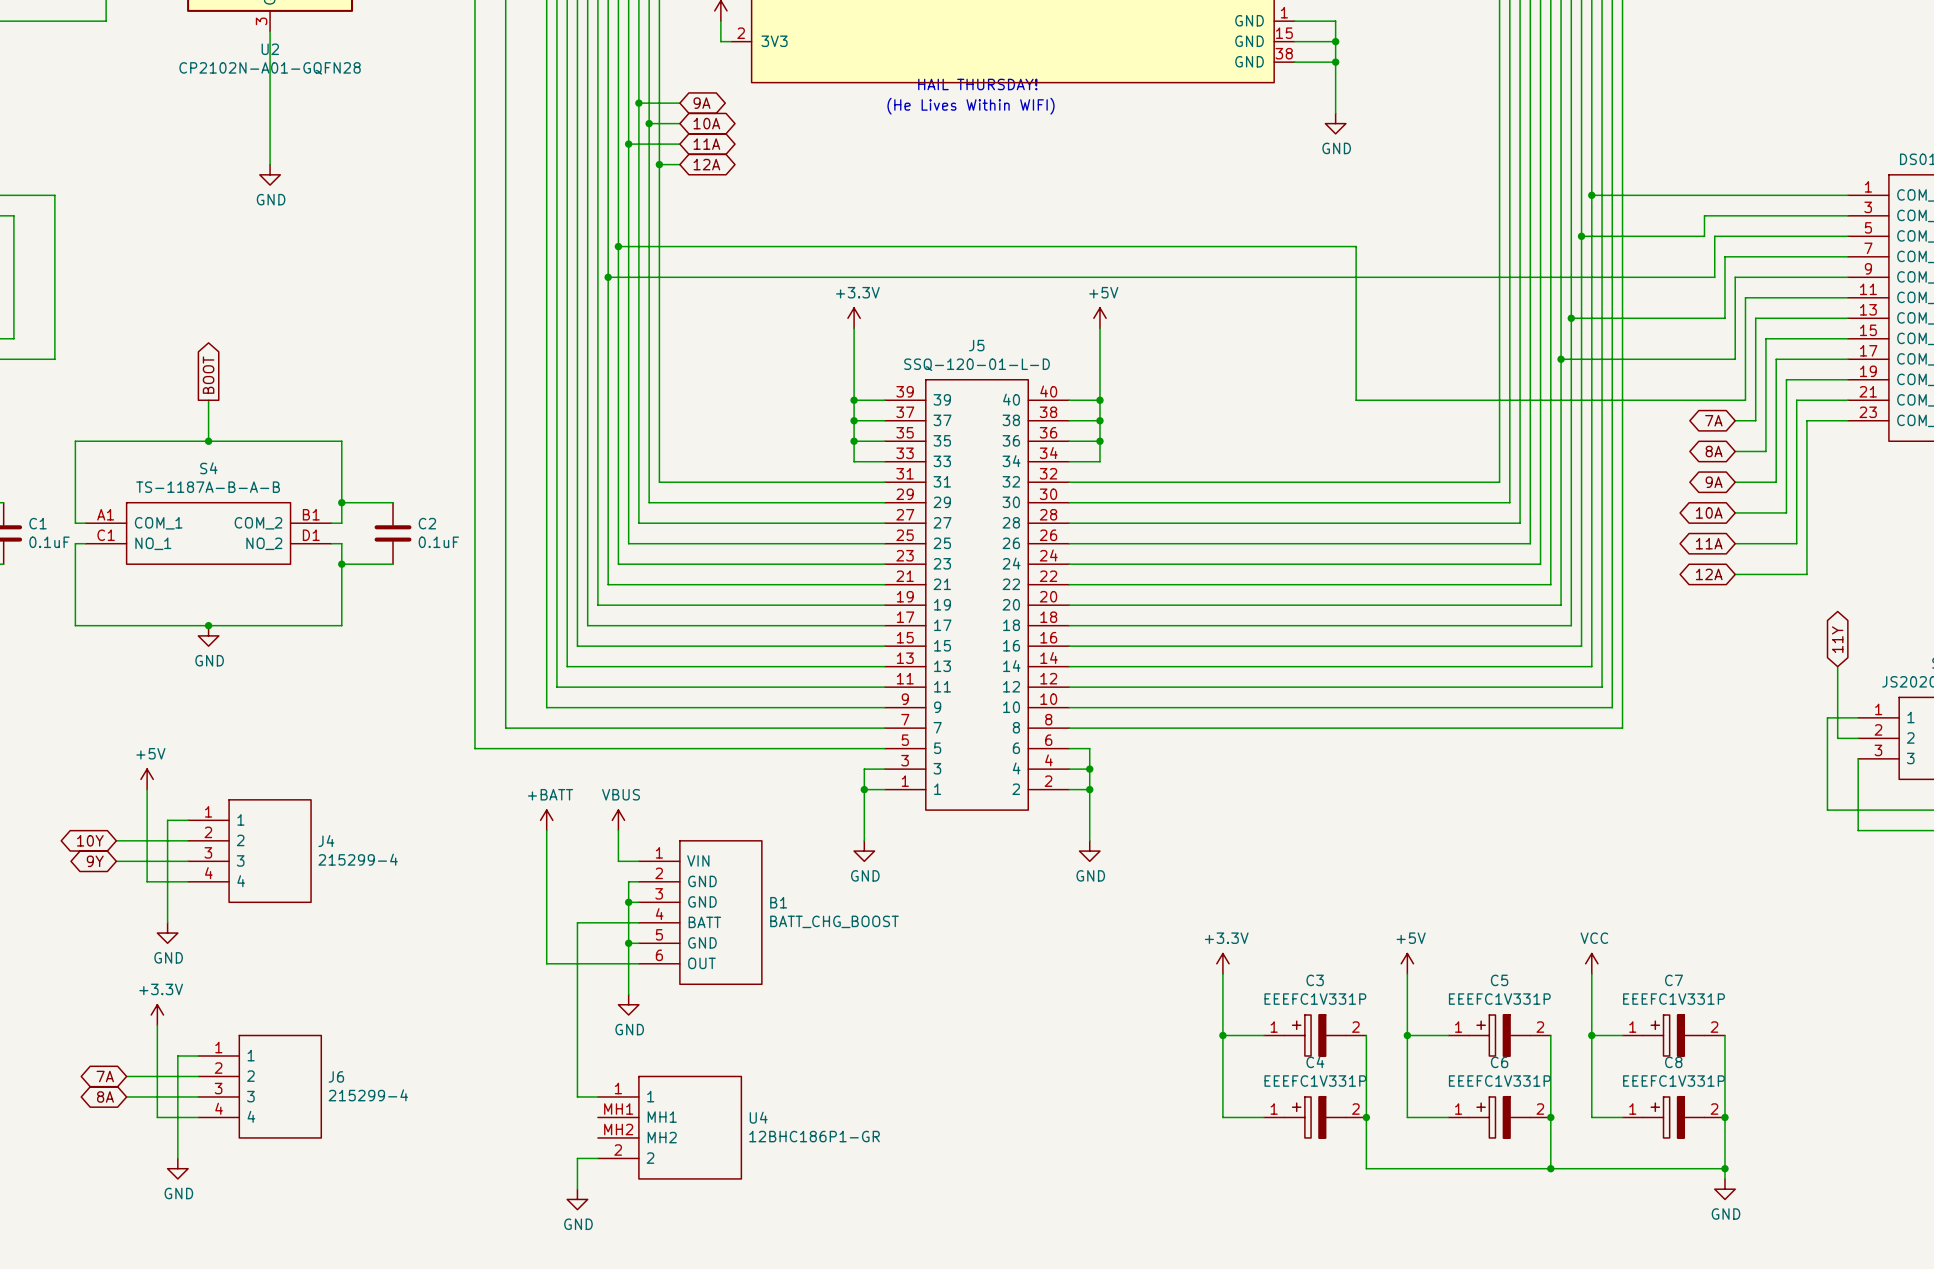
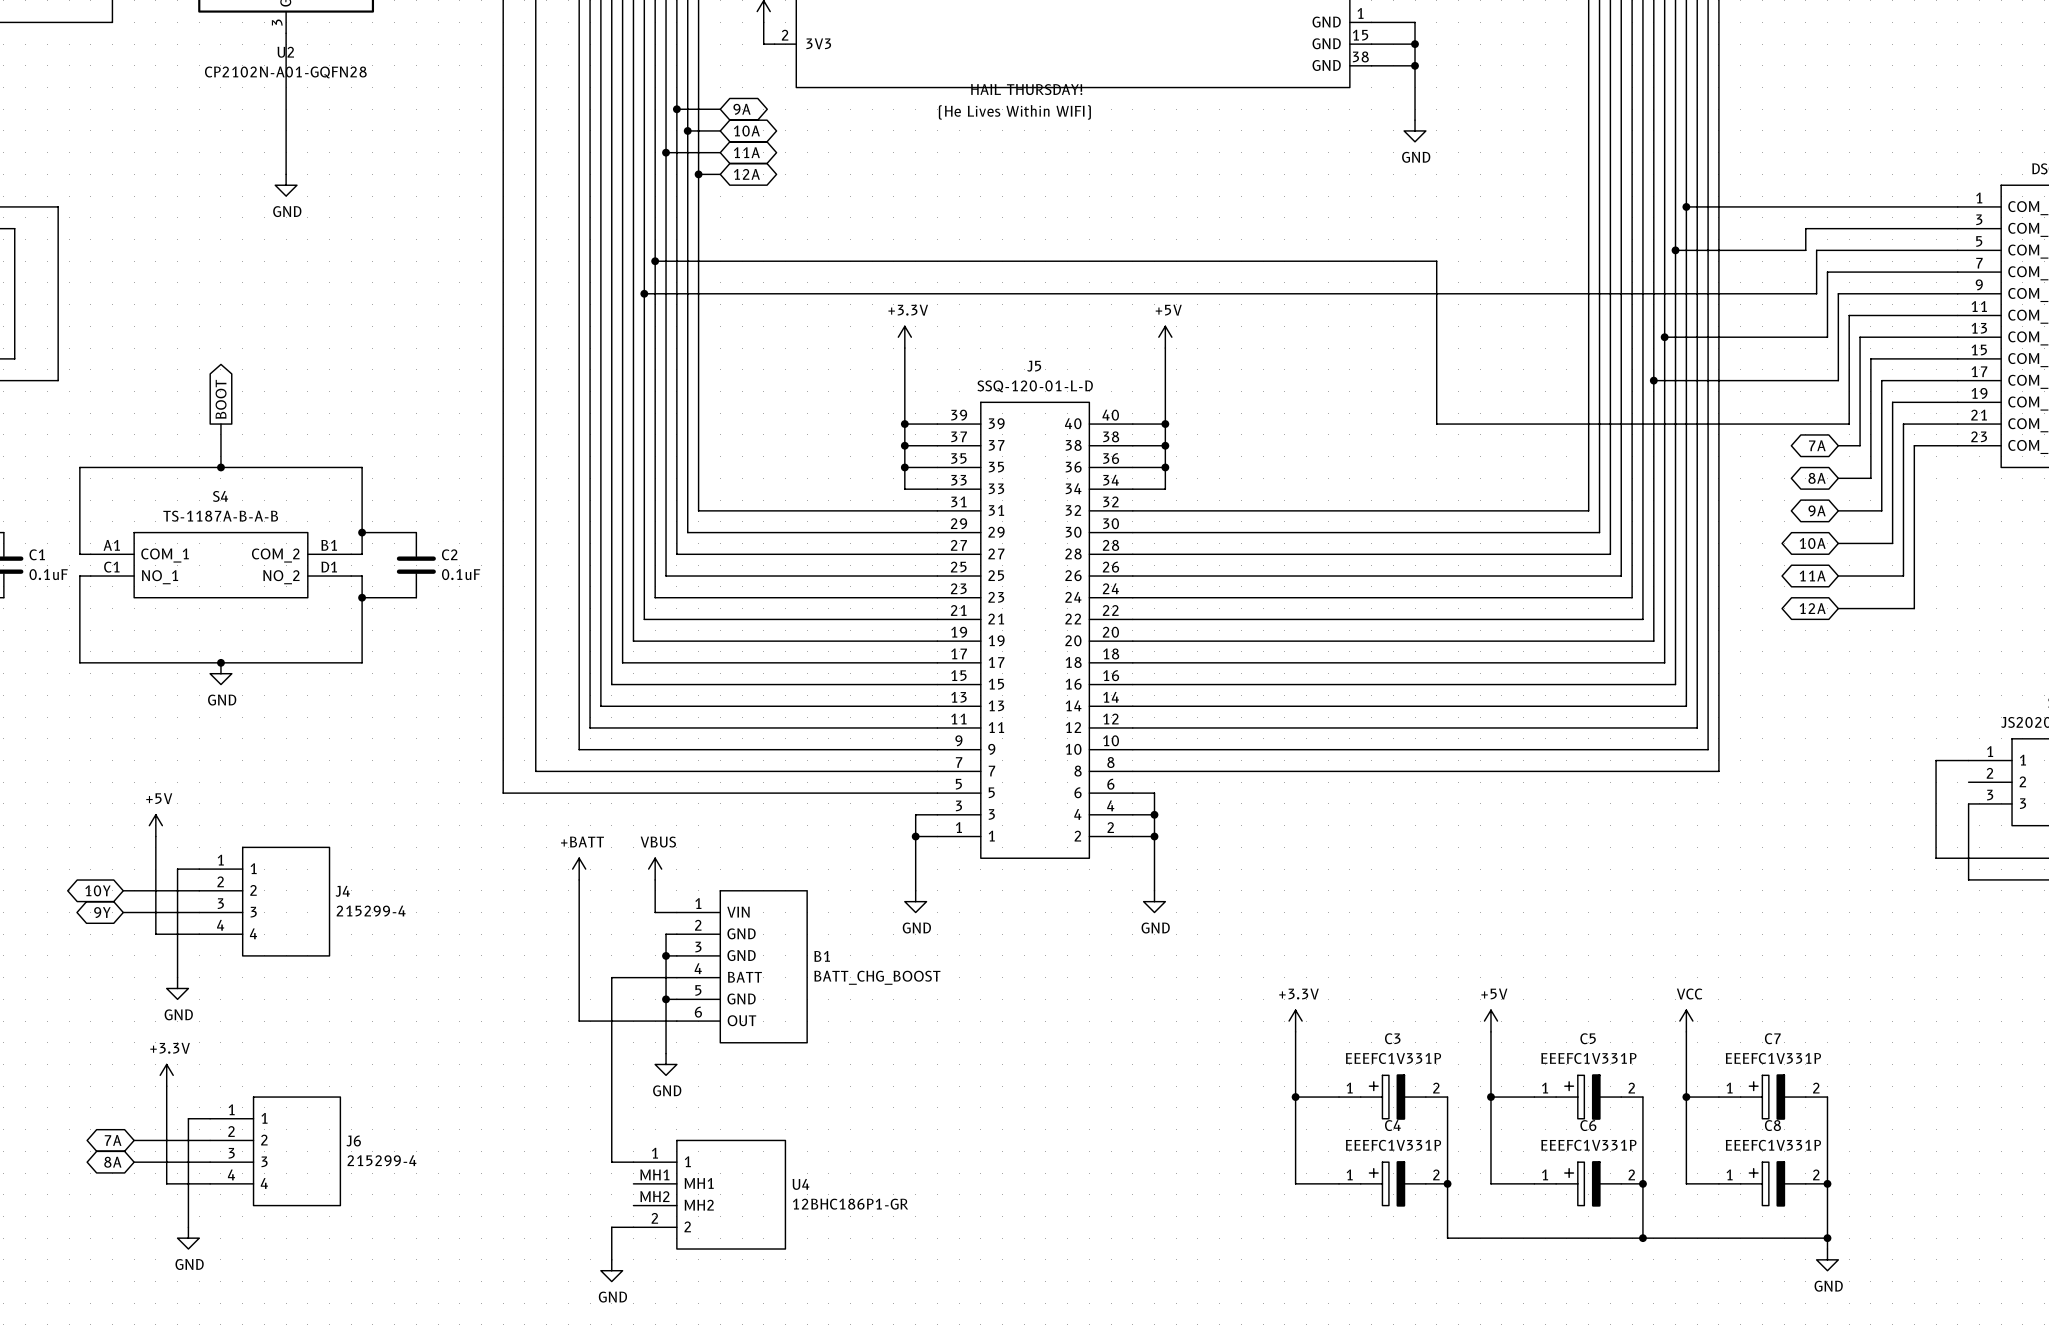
global label: 11Y (1837, 639) -> none
wire: (1837, 666) (1837, 738) (1858, 738) -> none

